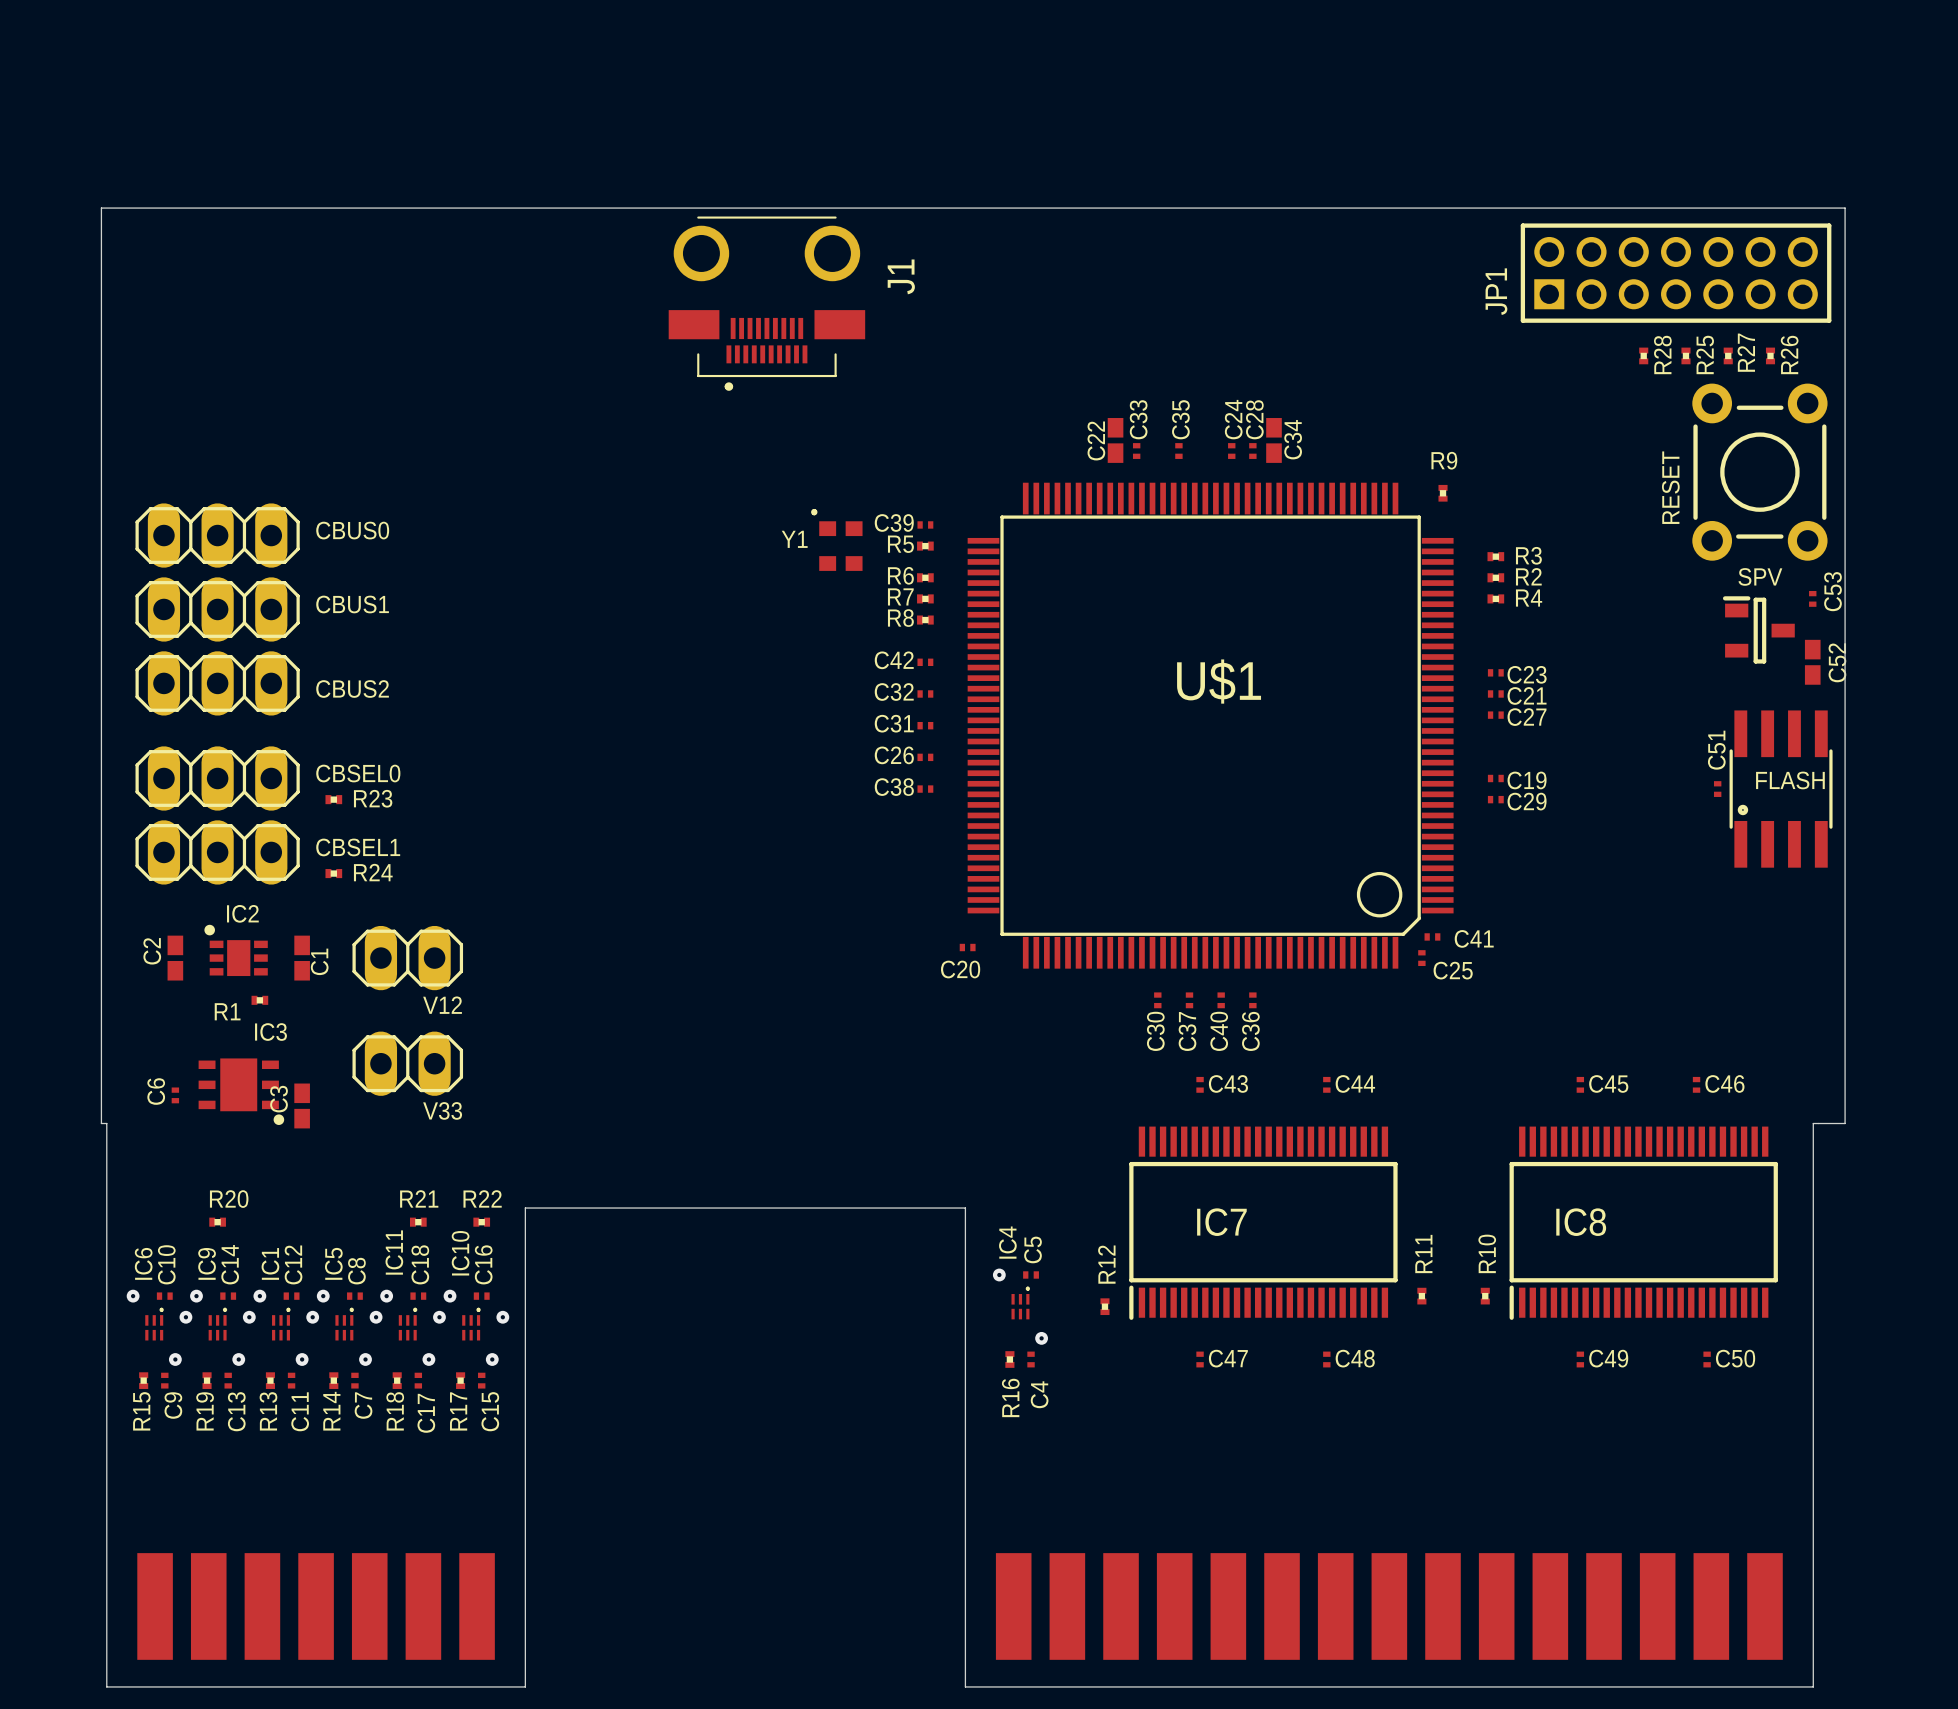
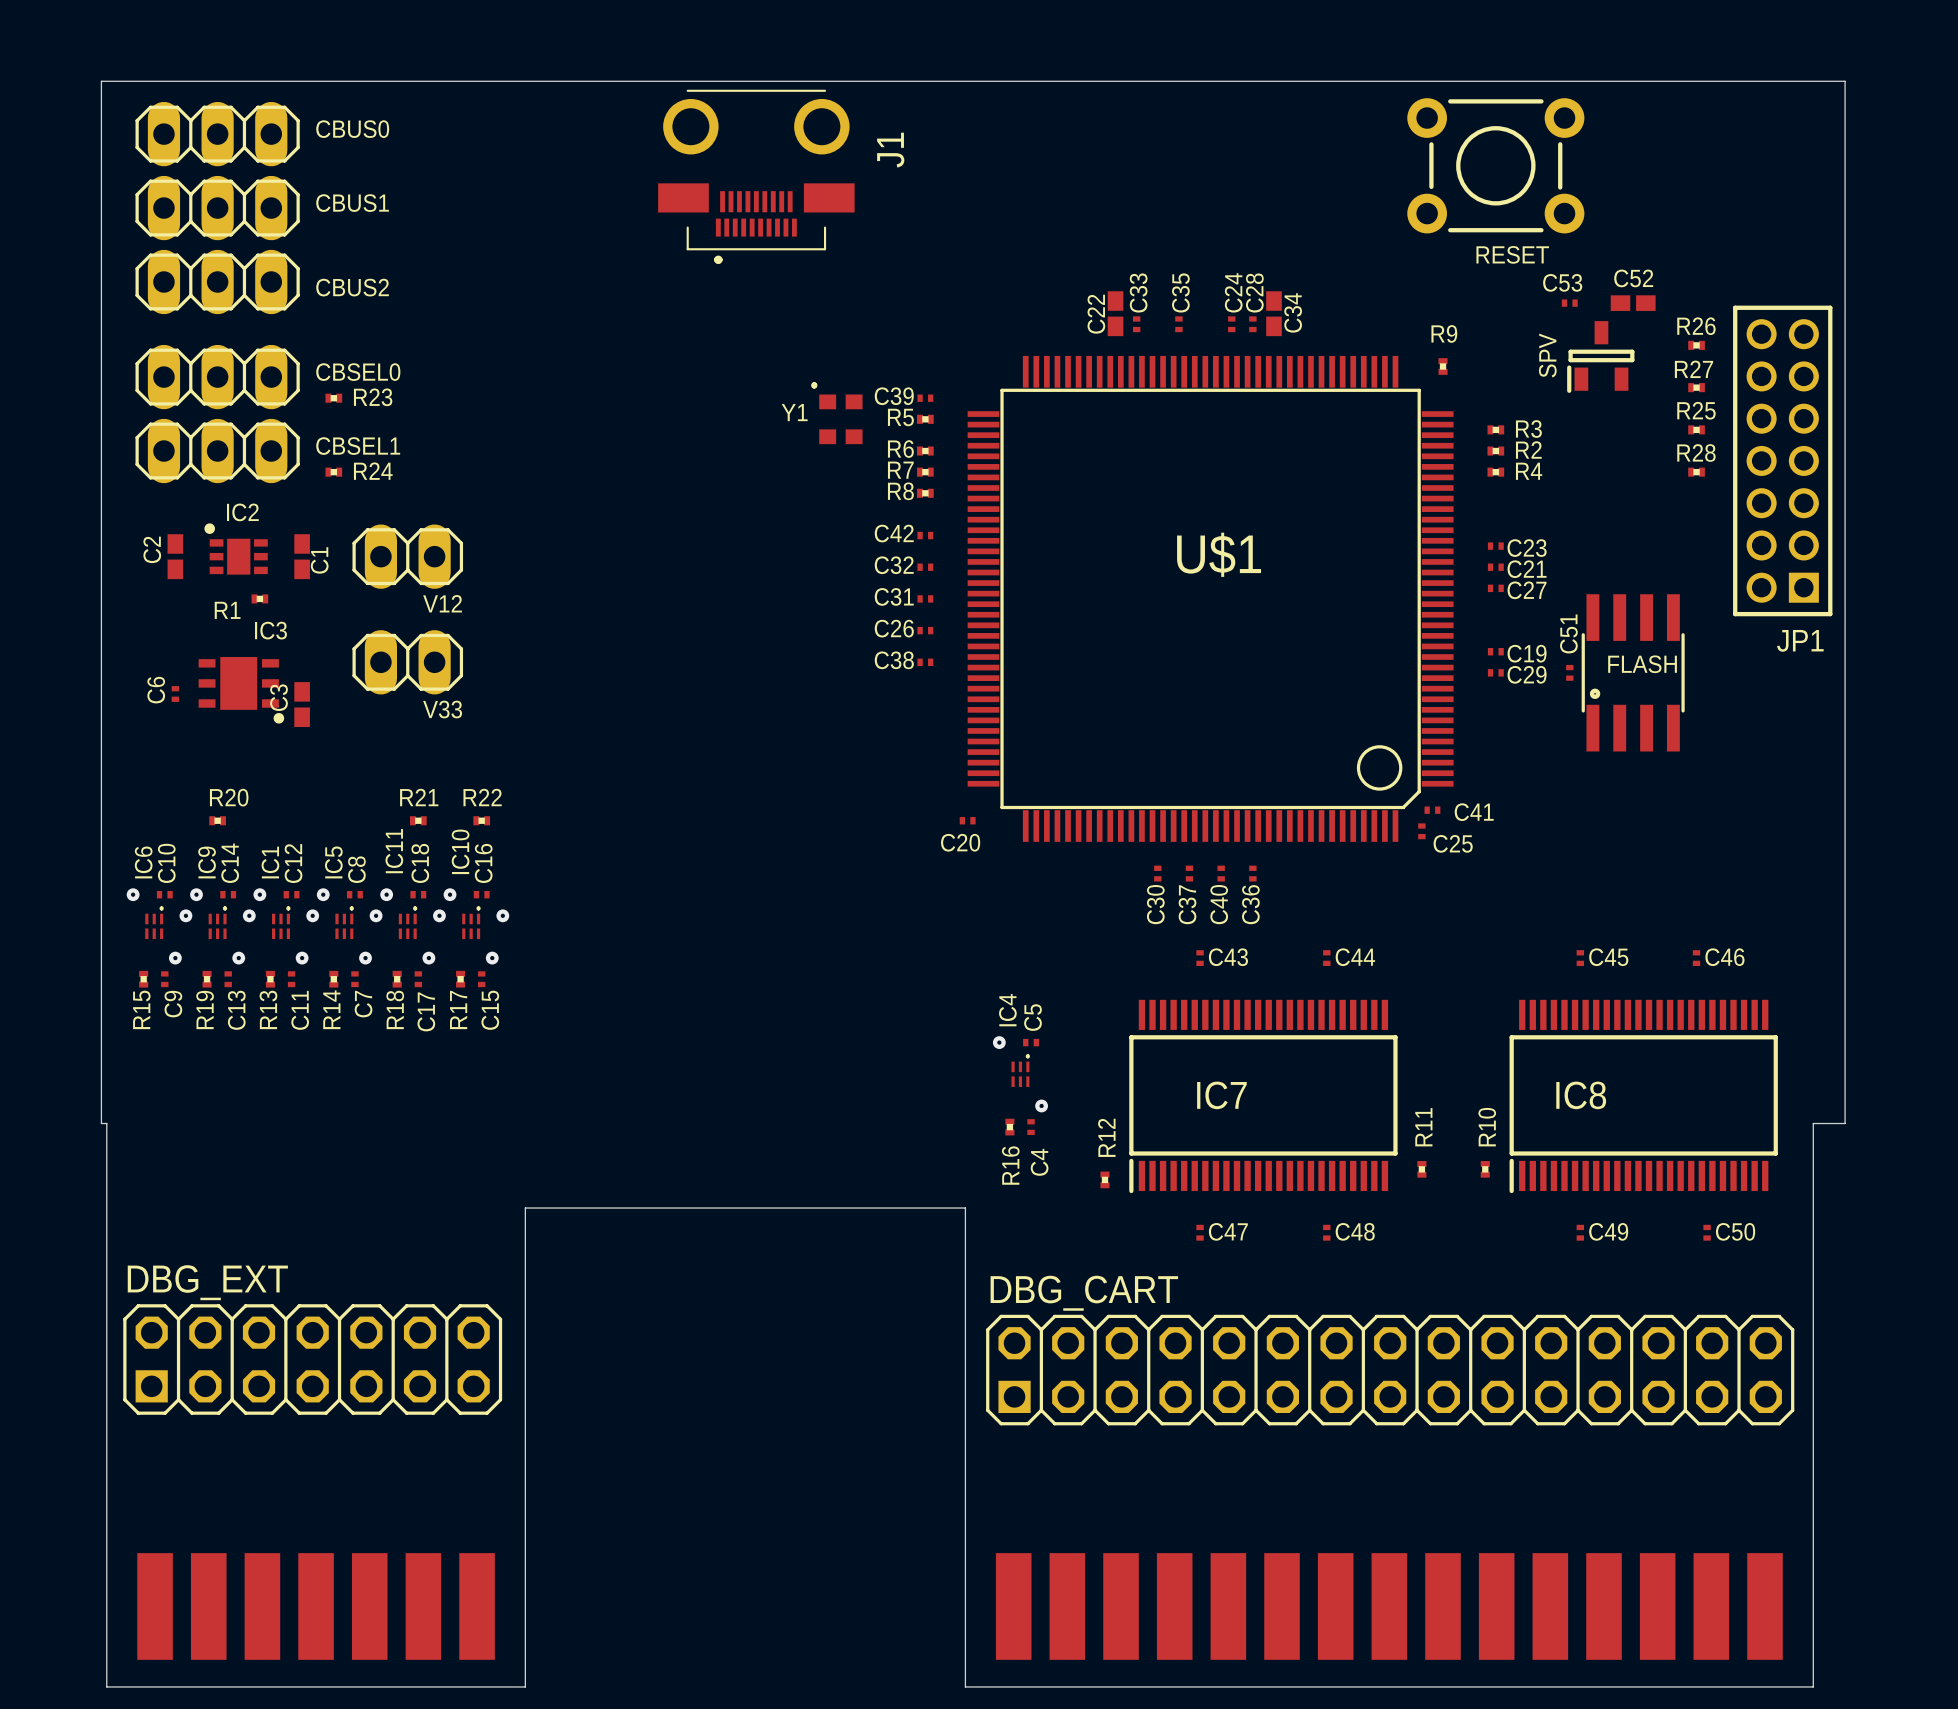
board edge: (101, 208) (1845, 208) -> (101, 208) (101, 81) (1845, 81) (1845, 208)
JP1 rotation: 0° (1676, 273) -> 90° counterclockwise (1782, 460)
JP1 position: (1676, 273) -> (1782, 460)
J1 position: (766, 303) -> (756, 176)
R28 rotation: 0° (1643, 355) -> 90° clockwise (1696, 472)
R28 position: (1643, 355) -> (1696, 472)
R25 rotation: 0° (1685, 355) -> 90° clockwise (1696, 429)
R25 position: (1685, 355) -> (1696, 429)
R27 rotation: 0° (1728, 355) -> 90° clockwise (1696, 387)
R27 position: (1728, 355) -> (1696, 387)
R26 rotation: 0° (1770, 355) -> 90° clockwise (1696, 345)
R26 position: (1770, 355) -> (1696, 345)
C22 position: (1115, 440) -> (1115, 313)
C34 position: (1273, 440) -> (1273, 313)
C33 position: (1136, 451) -> (1136, 324)
C35 position: (1178, 451) -> (1178, 324)
C24 position: (1231, 451) -> (1231, 324)
C28 position: (1252, 451) -> (1252, 324)
RESET rotation: 0° (1759, 472) -> 90° clockwise (1495, 165)
RESET position: (1759, 472) -> (1495, 165)
RESET name position: RESET (1670, 487) -> RESET (1512, 254)
R9 position: (1443, 493) -> (1443, 366)
C39 position: (925, 524) -> (925, 398)
CBUS0 position: (217, 535) -> (217, 134)
C42: none -> (925, 535)
Y1 position: (836, 539) -> (836, 413)
R5 position: (925, 546) -> (925, 419)
C23: none -> (1495, 546)
R3 position: (1495, 556) -> (1495, 429)
R6 position: (925, 577) -> (925, 451)
R2 position: (1495, 577) -> (1495, 451)
R7 position: (925, 598) -> (925, 472)
R4 position: (1495, 598) -> (1495, 472)
C53 rotation: 0° (1812, 598) -> 90° clockwise (1569, 303)
C53 position: (1812, 598) -> (1569, 303)
CBUS1 position: (217, 609) -> (217, 208)
R8 position: (925, 620) -> (925, 493)
SPV rotation: 0° (1758, 629) -> 90° counterclockwise (1600, 357)
SPV position: (1758, 629) -> (1600, 357)
C42 name: C42 (894, 660) -> C38 (894, 660)
C52 rotation: 0° (1812, 662) -> 90° clockwise (1633, 303)
C52 position: (1812, 662) -> (1633, 303)
C23 name: C23 (1527, 674) -> C29 (1527, 674)
CBUS2 position: (217, 683) -> (217, 282)
C32 position: (925, 693) -> (925, 567)
C21 position: (1495, 693) -> (1495, 567)
C27 position: (1495, 715) -> (1495, 588)
C31 position: (925, 725) -> (925, 598)
U$1 position: (1210, 725) -> (1210, 598)
C26 position: (925, 757) -> (925, 630)
CBSEL0 position: (217, 778) -> (217, 377)
C19 position: (1495, 778) -> (1495, 651)
C38: (925, 789) -> none
C51 position: (1717, 789) -> (1569, 672)
FLASH position: (1781, 789) -> (1633, 672)
R23 position: (333, 799) -> (333, 398)
C29: (1495, 799) -> none
CBSEL1 position: (217, 852) -> (217, 451)
R24 position: (333, 873) -> (333, 472)
via: none -> (133, 894)
via: none -> (196, 894)
via: none -> (259, 894)
via: none -> (323, 894)
via: none -> (386, 894)
via: none -> (450, 894)
via: none -> (185, 915)
via: none -> (249, 915)
via: none -> (312, 915)
via: none -> (376, 915)
via: none -> (439, 915)
via: none -> (502, 915)
C41 position: (1432, 936) -> (1432, 810)
C20 position: (967, 947) -> (967, 820)
IC2 position: (236, 950) -> (236, 549)
C2 position: (175, 958) -> (175, 556)
via: none -> (175, 958)
via: none -> (238, 958)
C1 position: (302, 958) -> (302, 556)
via: none -> (302, 958)
via: none -> (365, 958)
V12 position: (407, 958) -> (407, 556)
via: none -> (428, 958)
via: none -> (492, 958)
C25 position: (1421, 958) -> (1421, 831)
R1 position: (259, 1000) -> (259, 598)
C30 position: (1157, 1000) -> (1157, 873)
C37 position: (1189, 1000) -> (1189, 873)
C40 position: (1221, 1000) -> (1221, 873)
C36 position: (1252, 1000) -> (1252, 873)
via: none -> (999, 1042)
V33 position: (407, 1063) -> (407, 662)
C43 position: (1200, 1084) -> (1200, 958)
C44 position: (1326, 1084) -> (1326, 958)
C45 position: (1580, 1084) -> (1580, 958)
C46 position: (1696, 1084) -> (1696, 958)
IC3 position: (241, 1091) -> (241, 690)
C6 position: (175, 1095) -> (175, 693)
C3 position: (302, 1105) -> (302, 704)
via: none -> (1041, 1105)
R20 position: (217, 1222) -> (217, 820)
R21 position: (418, 1222) -> (418, 820)
R22 position: (481, 1222) -> (481, 820)
IC7 position: (1263, 1223) -> (1263, 1096)
IC8 position: (1643, 1223) -> (1643, 1096)
via: (999, 1274) -> none
C5 position: (1031, 1274) -> (1031, 1042)
via: (133, 1296) -> none
C10 position: (164, 1296) -> (164, 894)
via: (196, 1296) -> none
C14 position: (228, 1296) -> (228, 894)
via: (259, 1296) -> none
C12 position: (291, 1296) -> (291, 894)
via: (323, 1296) -> none
C8 position: (354, 1296) -> (354, 894)
via: (386, 1296) -> none
C18 position: (418, 1296) -> (418, 894)
via: (450, 1296) -> none
C16 position: (481, 1296) -> (481, 894)
R11 position: (1421, 1296) -> (1421, 1169)
R10 position: (1485, 1296) -> (1485, 1169)
IC4 position: (1020, 1302) -> (1020, 1070)
R12 position: (1104, 1306) -> (1104, 1179)
via: (185, 1317) -> none
via: (249, 1317) -> none
via: (312, 1317) -> none
via: (376, 1317) -> none
via: (439, 1317) -> none
via: (502, 1317) -> none
IC6 position: (154, 1324) -> (154, 922)
IC9 position: (217, 1324) -> (217, 922)
IC1 position: (281, 1324) -> (281, 922)
IC5 position: (344, 1324) -> (344, 922)
IC11 position: (408, 1324) -> (408, 922)
IC10 position: (471, 1324) -> (471, 922)
via: (1041, 1338) -> none
via: (175, 1359) -> none
via: (238, 1359) -> none
via: (302, 1359) -> none
DBG_EXT: none -> (312, 1359)
via: (365, 1359) -> none
via: (428, 1359) -> none
via: (492, 1359) -> none
R16 position: (1009, 1359) -> (1009, 1127)
C4 position: (1031, 1359) -> (1031, 1127)
C47 position: (1200, 1359) -> (1200, 1232)
C48 position: (1326, 1359) -> (1326, 1232)
C49 position: (1580, 1359) -> (1580, 1232)
C50 position: (1707, 1359) -> (1707, 1232)
DBG_CART: none -> (1390, 1370)
R15 position: (143, 1380) -> (143, 979)
C9 position: (164, 1380) -> (164, 979)
R19 position: (207, 1380) -> (207, 979)
C13 position: (228, 1380) -> (228, 979)
R13 position: (270, 1380) -> (270, 979)
C11 position: (291, 1380) -> (291, 979)
R14 position: (333, 1380) -> (333, 979)
C7 position: (354, 1380) -> (354, 979)
R18 position: (397, 1380) -> (397, 979)
C17 position: (418, 1380) -> (418, 979)
R17 position: (460, 1380) -> (460, 979)
C15 position: (481, 1380) -> (481, 979)

